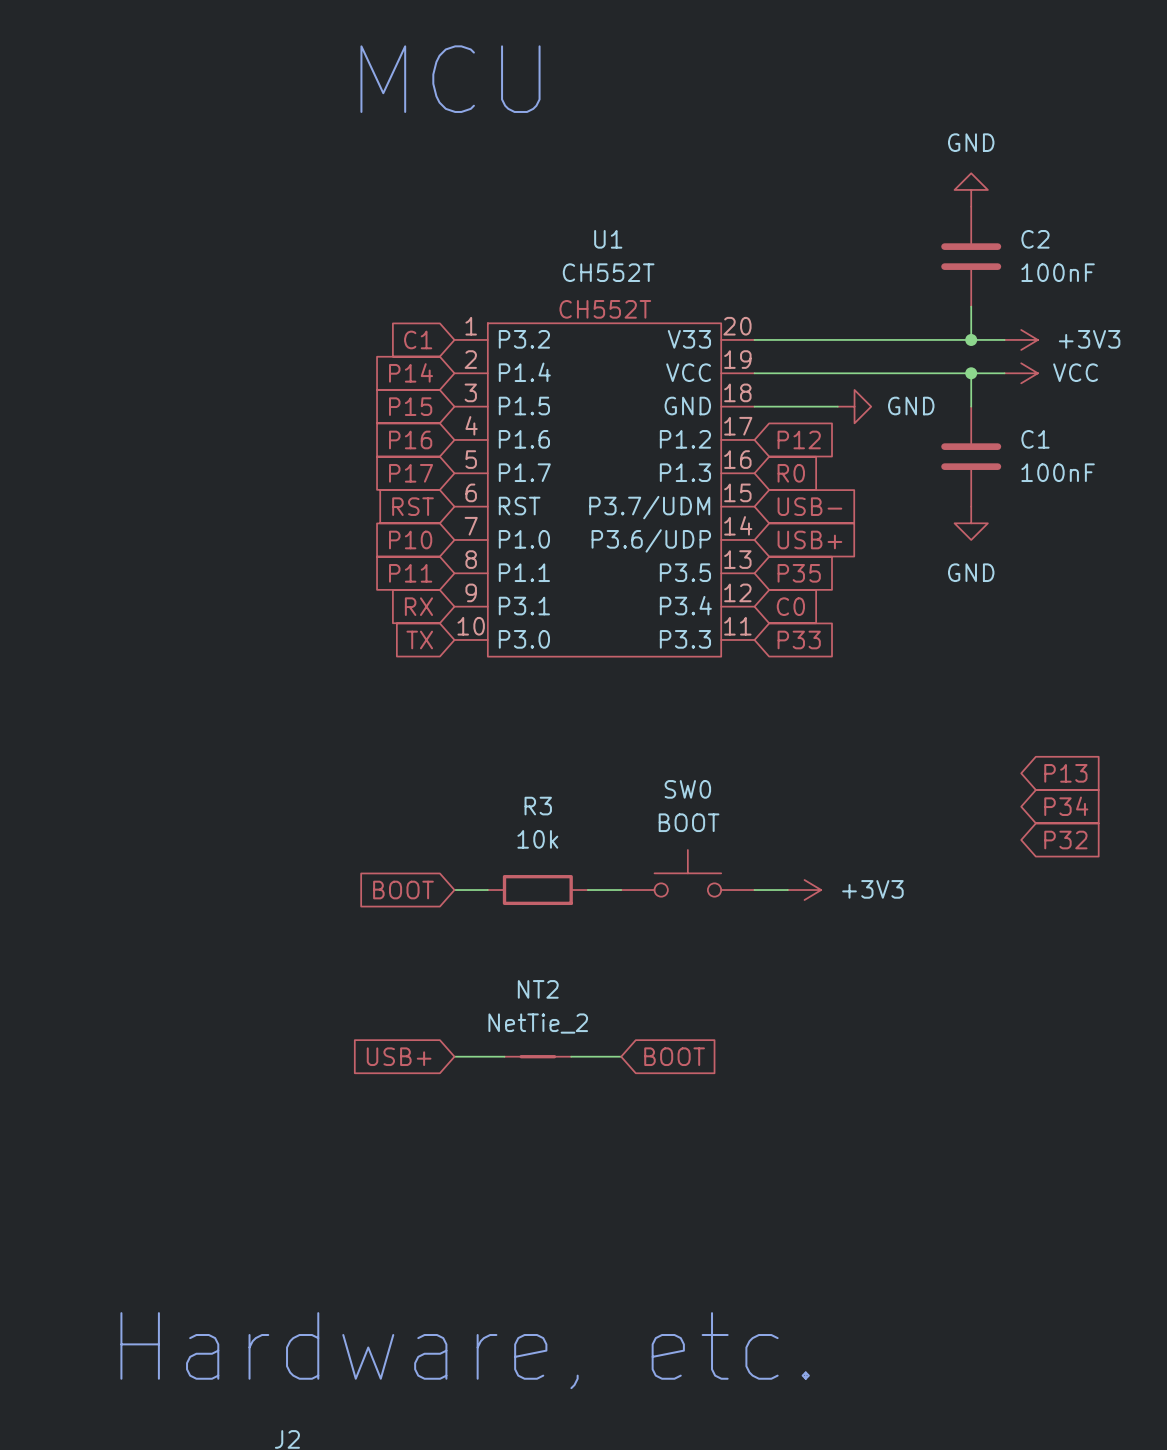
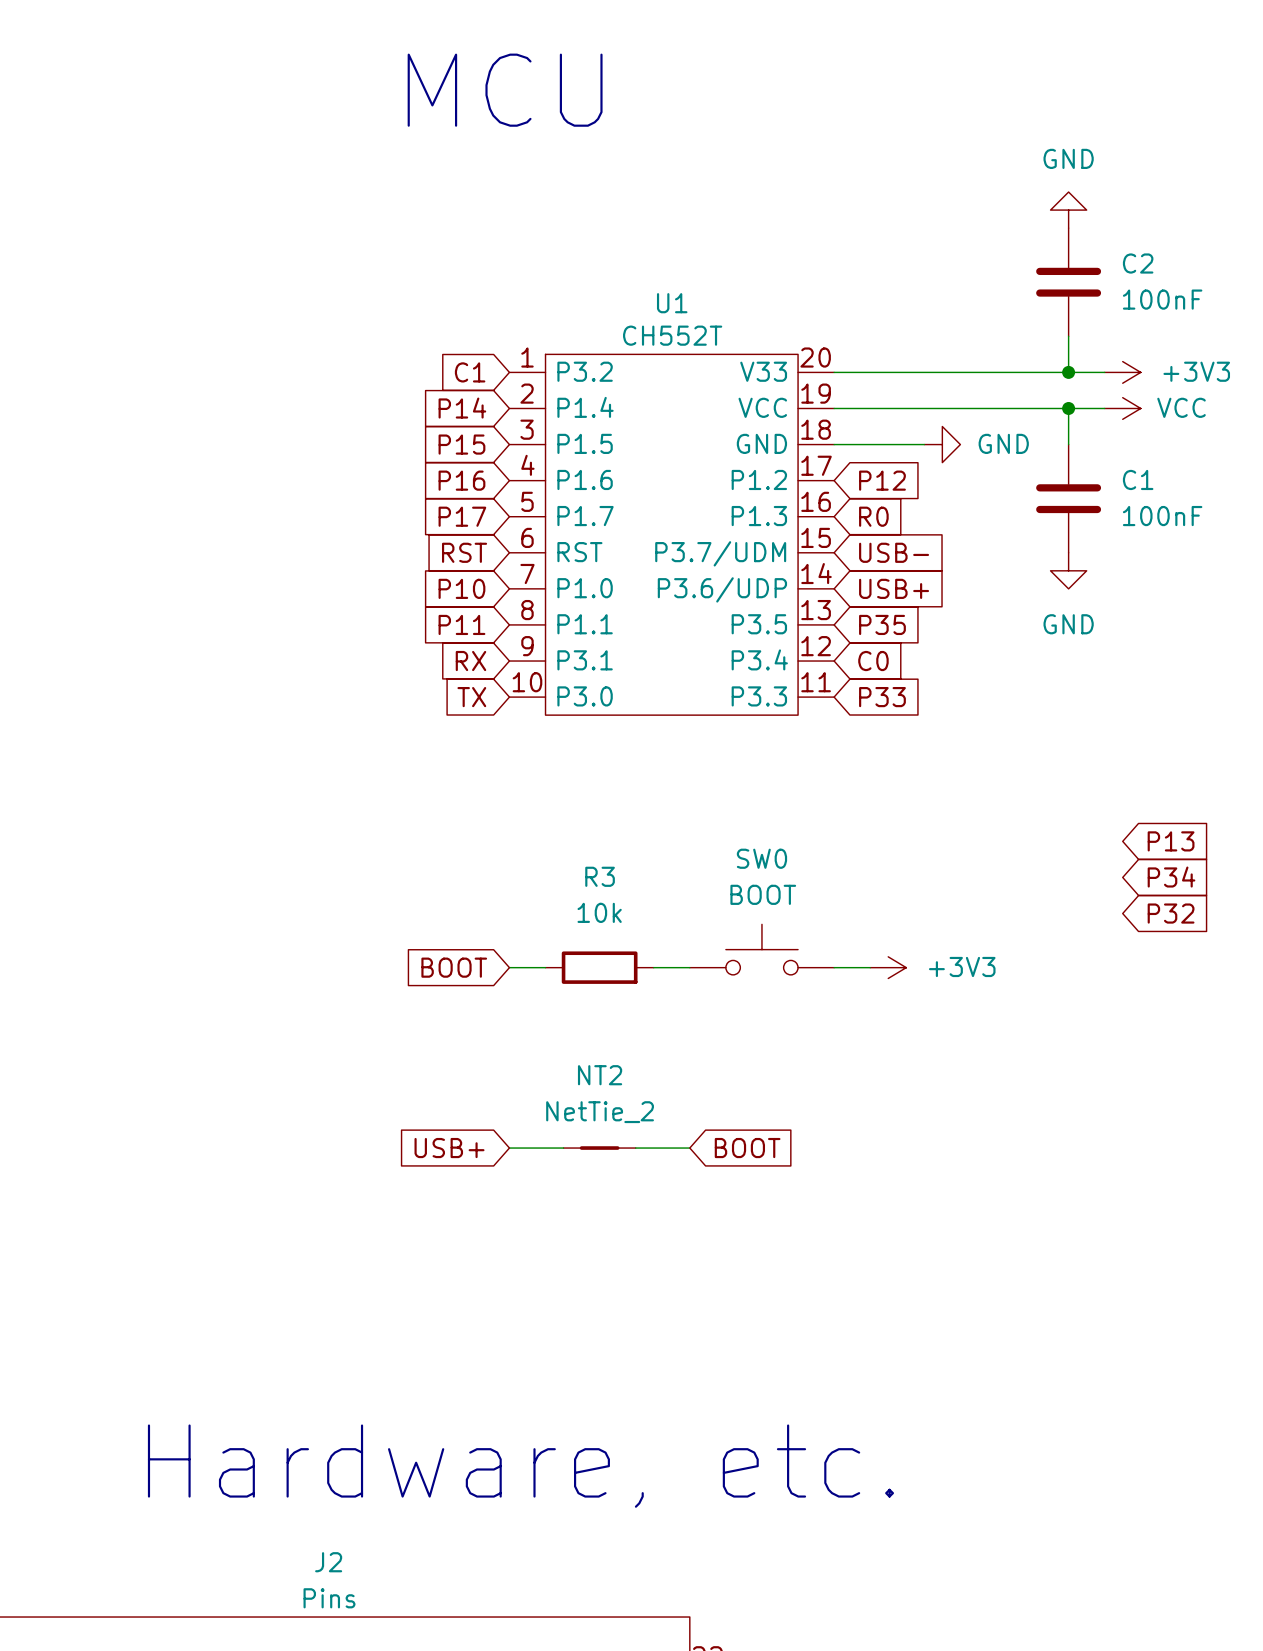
U1 name position: U1 (608, 239) -> U1 (672, 303)
U1 value position: CH552T (608, 272) -> CH552T (672, 335)
U1 text: CH552T (605, 309) -> none

